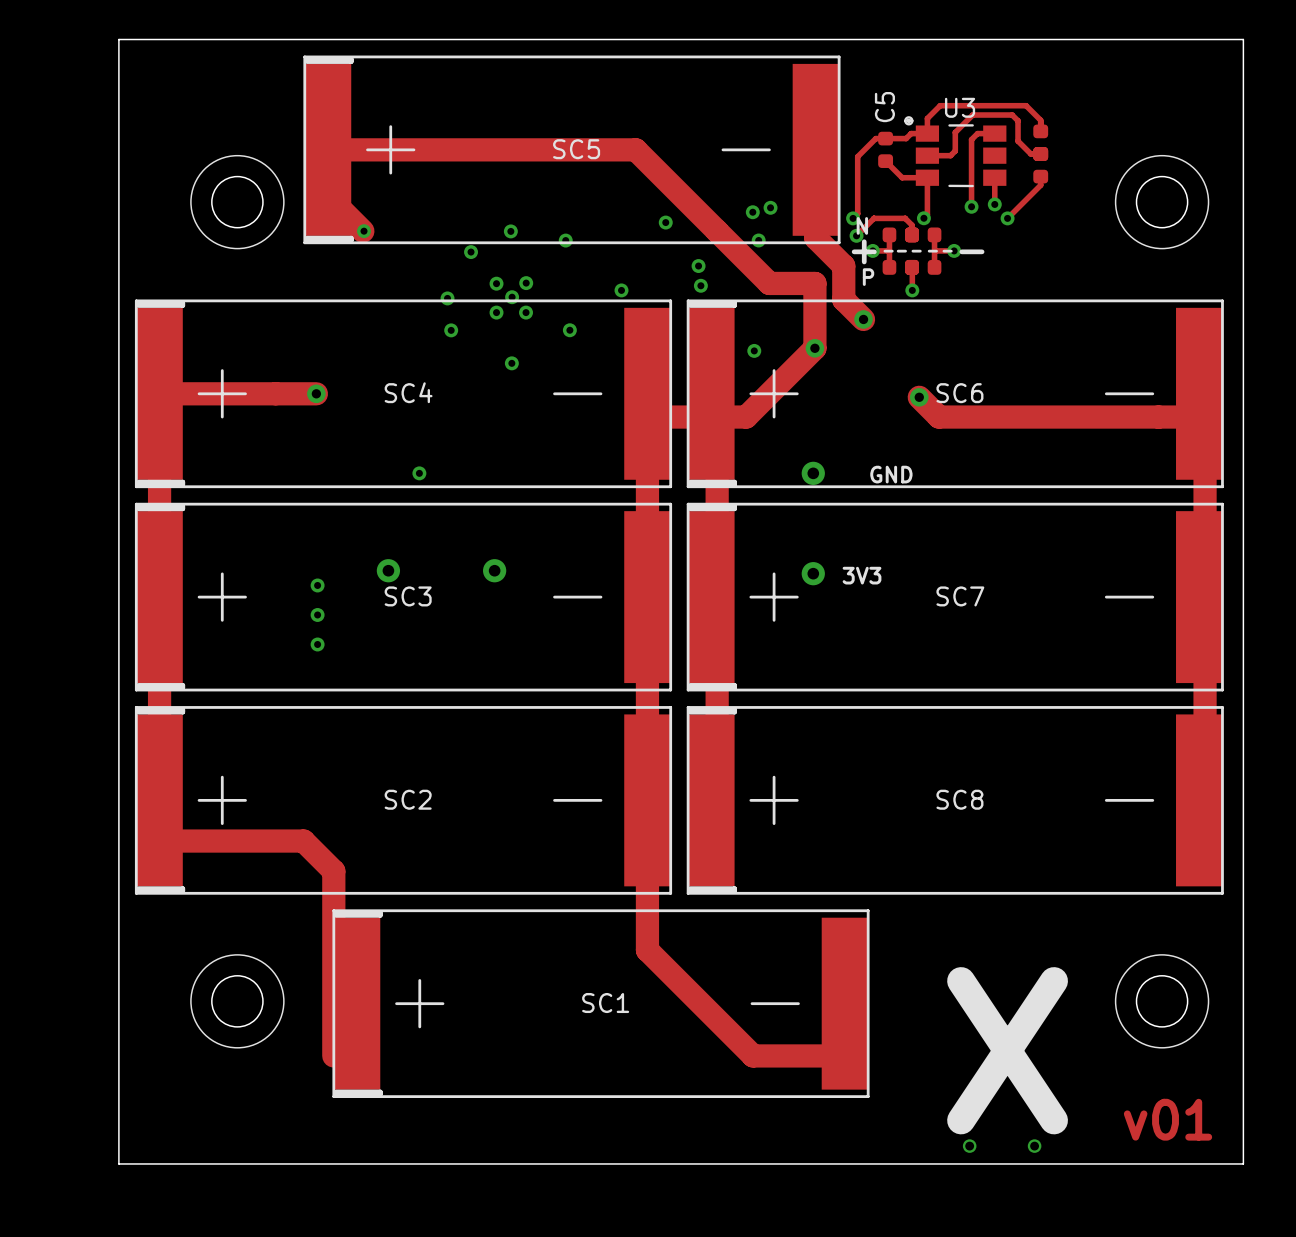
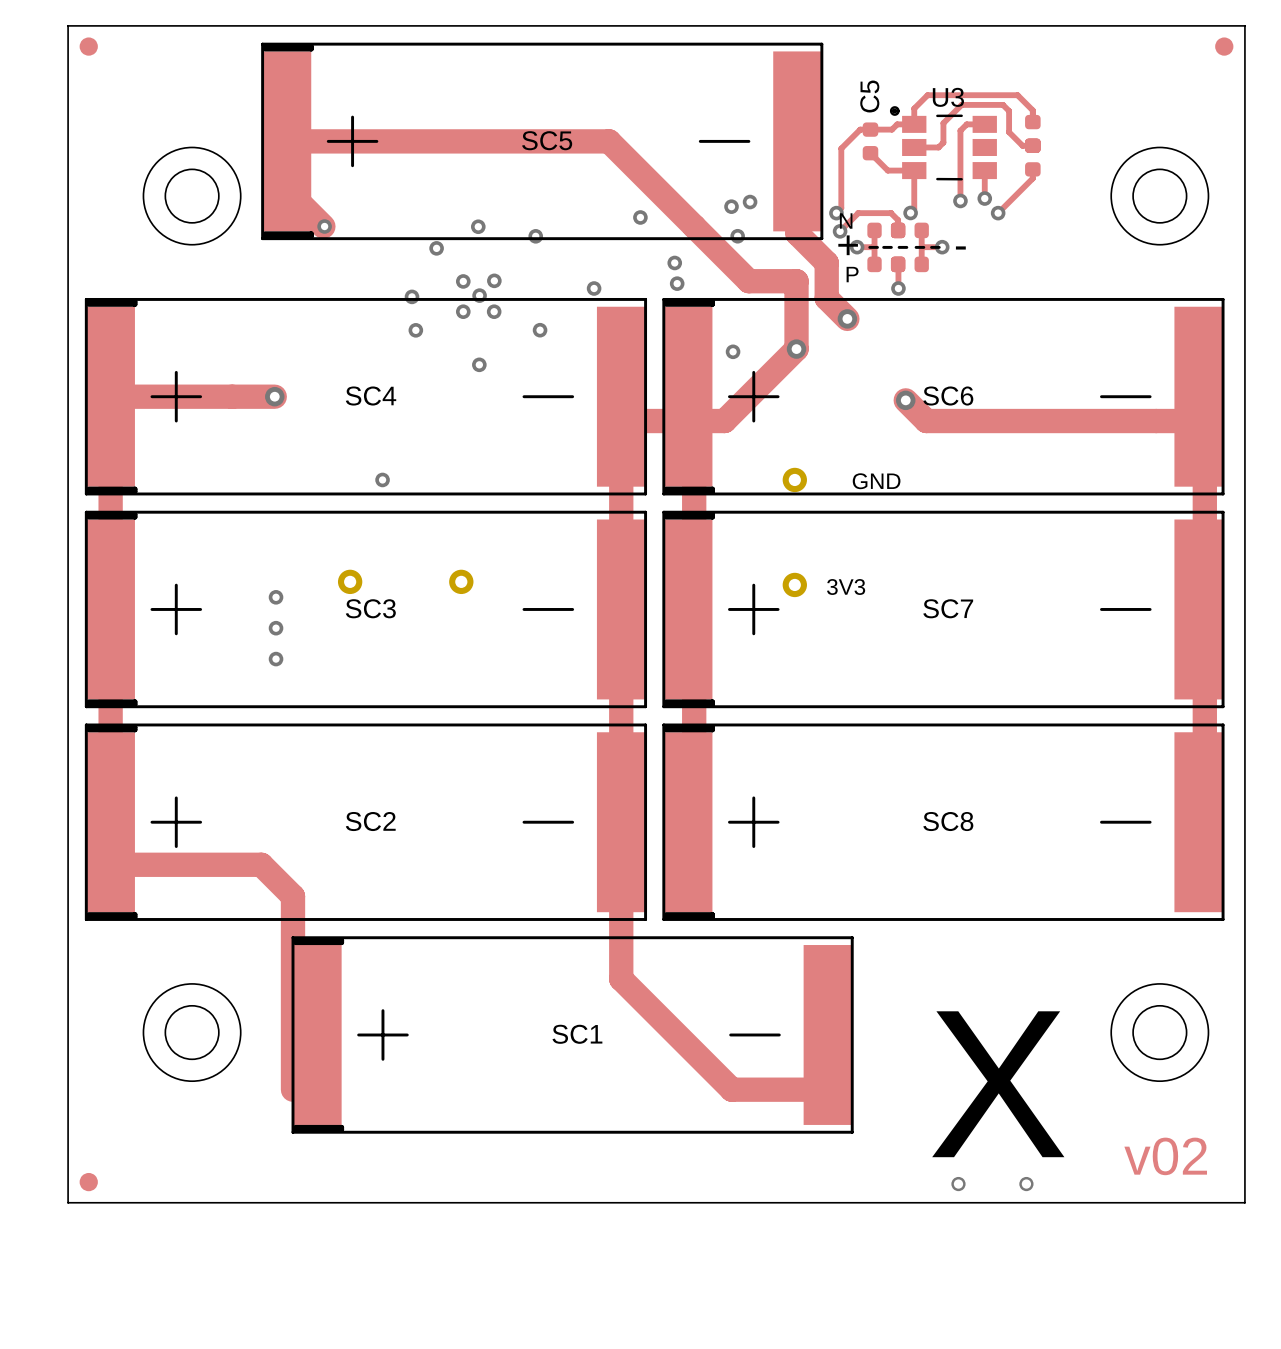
part: none -> (88, 46)
part: none -> (1224, 46)
text: v01 (1168, 1119) -> v02 (1165, 1156)
part: none -> (88, 1182)

